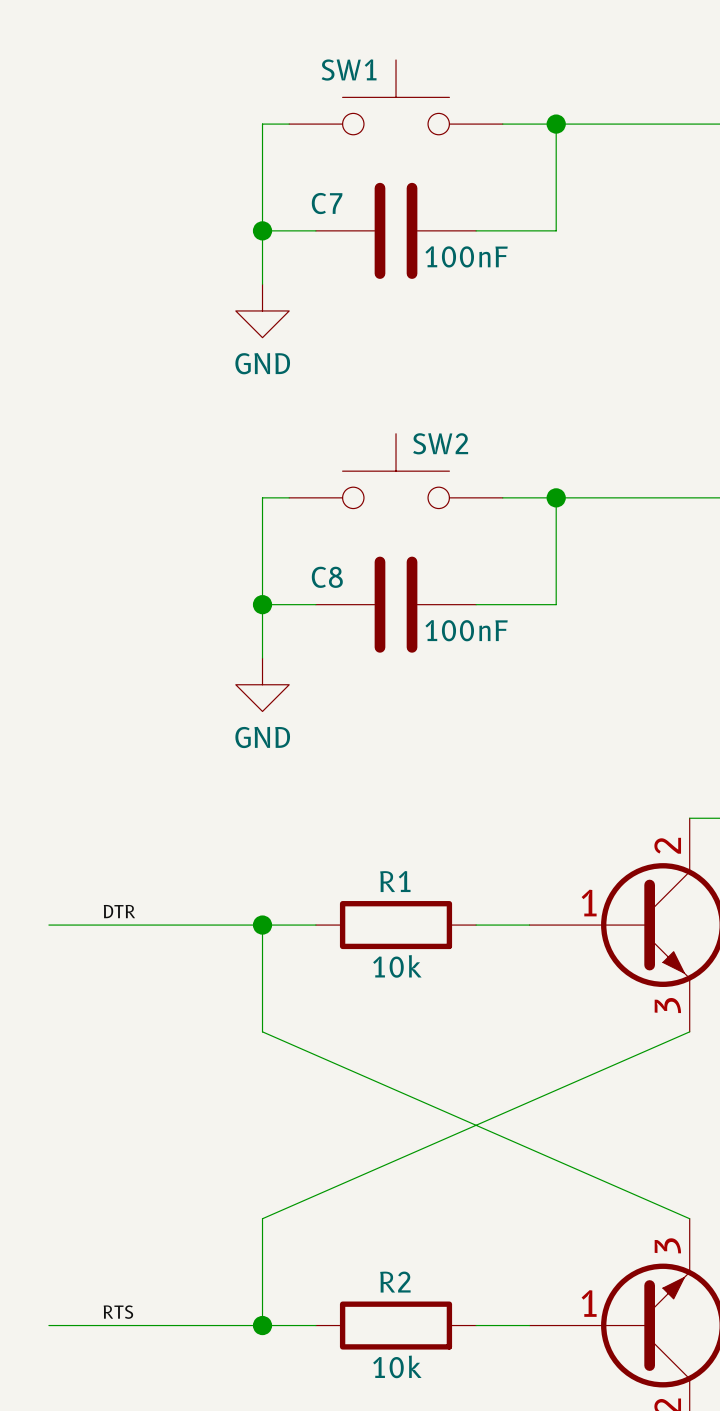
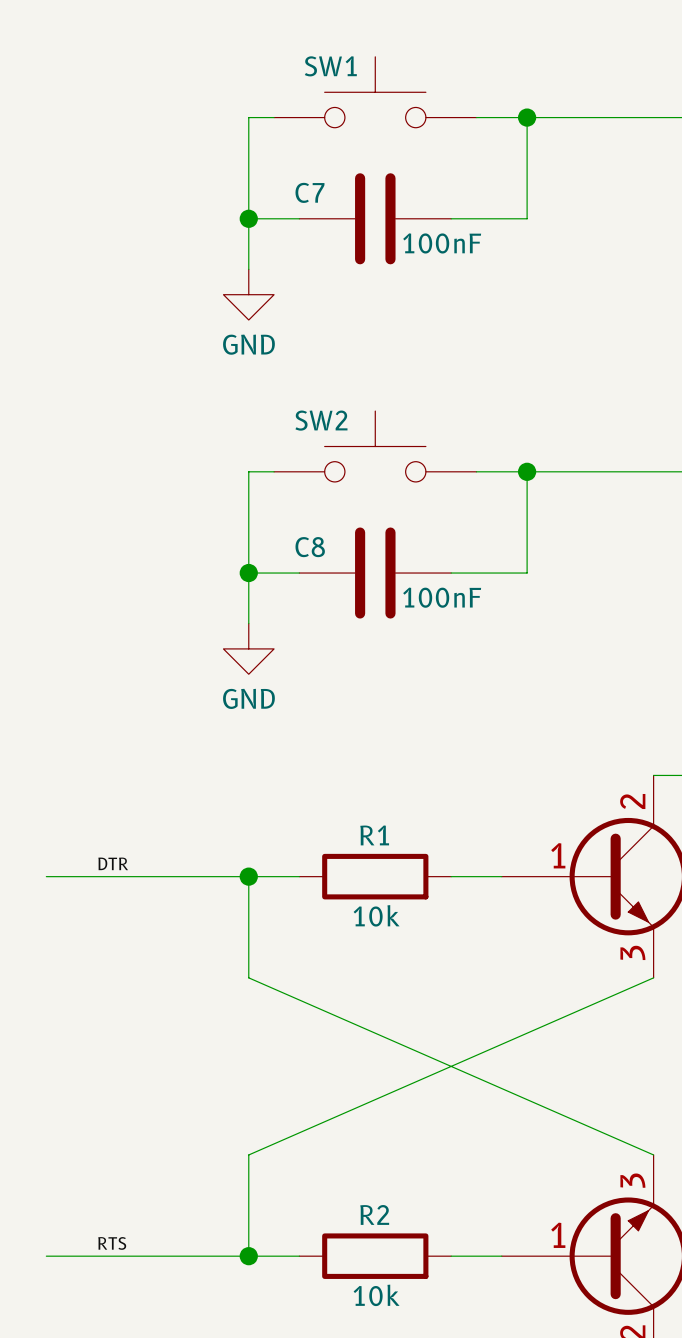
SW2 name position: SW2 (440, 443) -> SW2 (321, 420)

